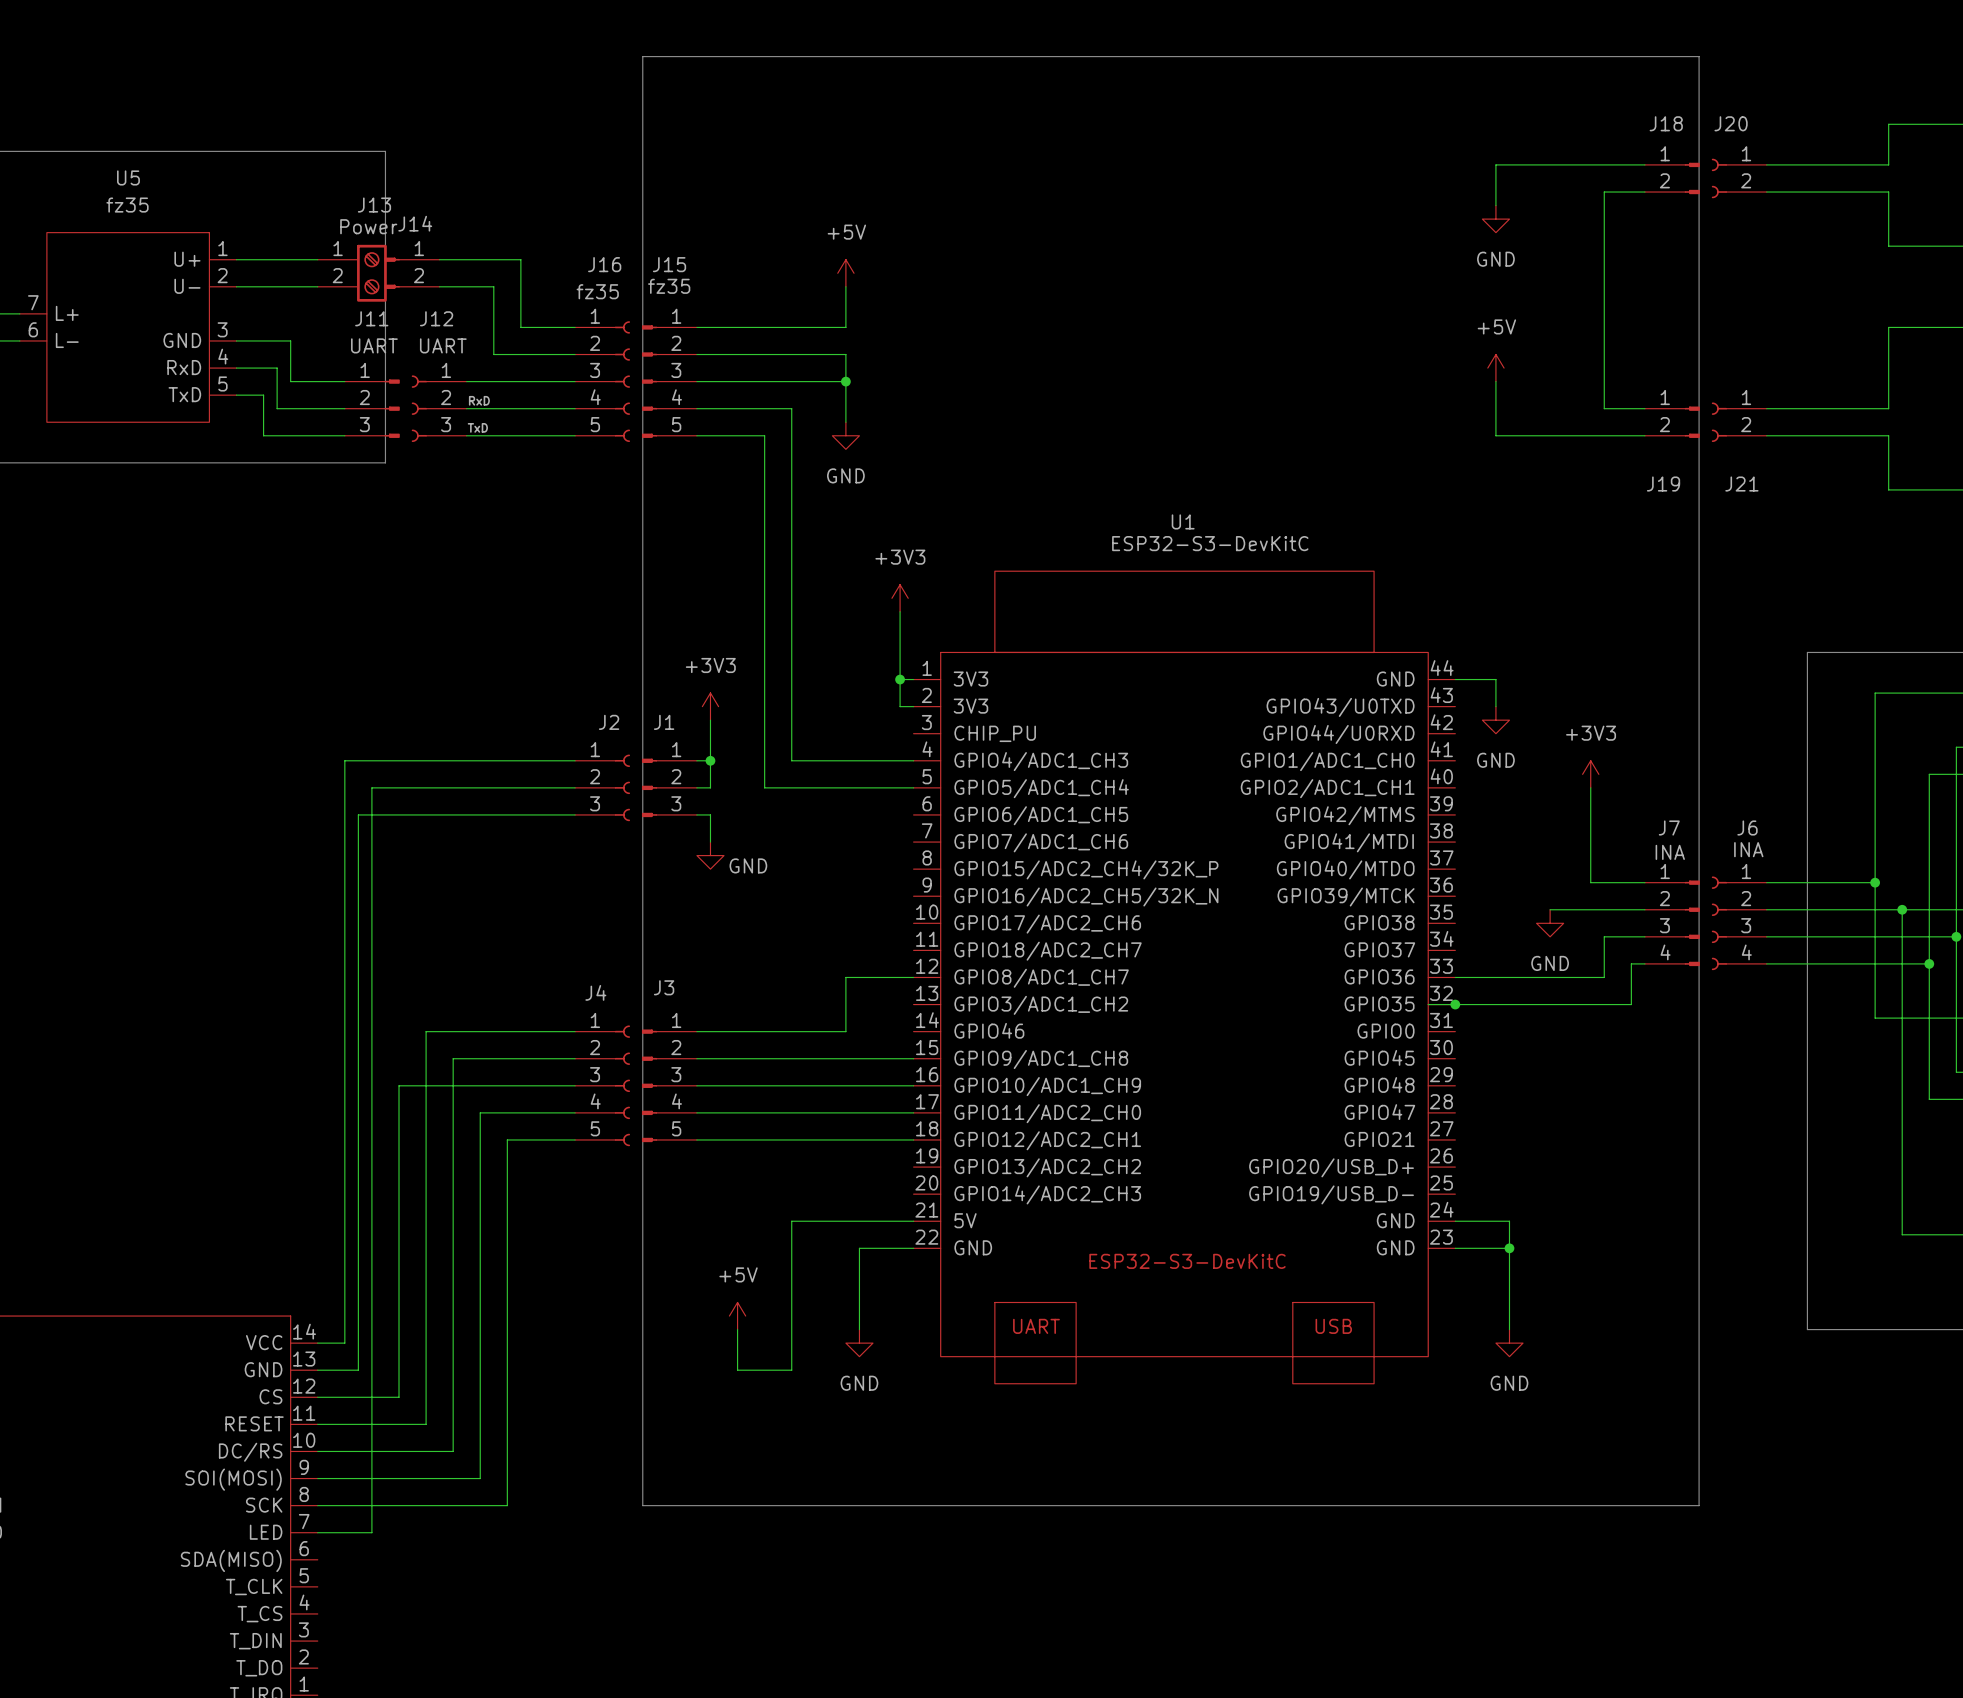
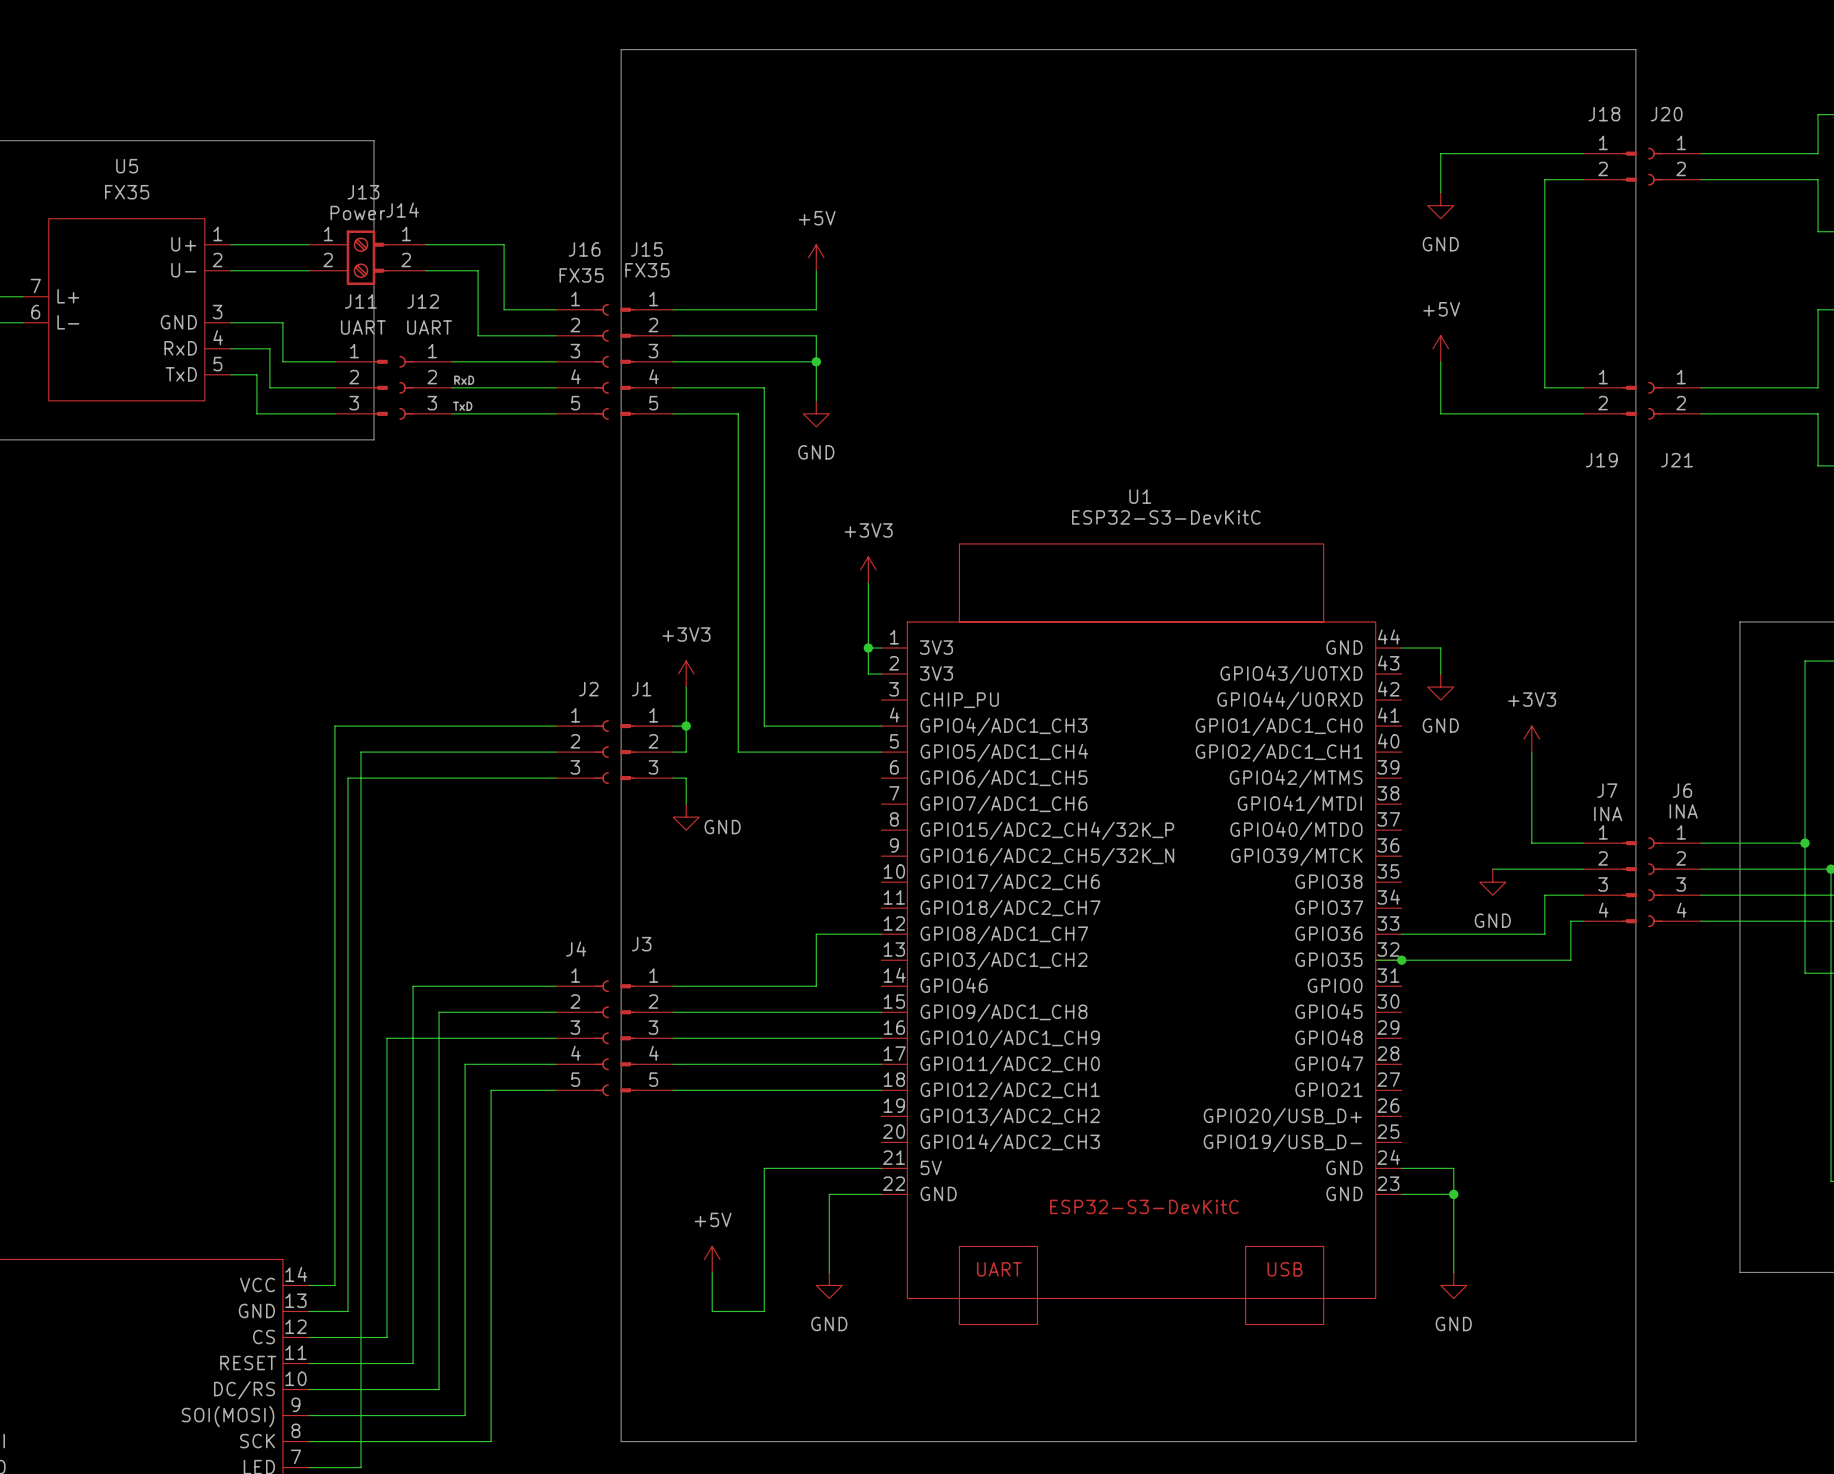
U5 value: fz35 (127, 205) -> FX35 (127, 192)
J15 value: fz35 (669, 286) -> FX35 (647, 270)
J16 value: fz35 (597, 291) -> FX35 (581, 275)

